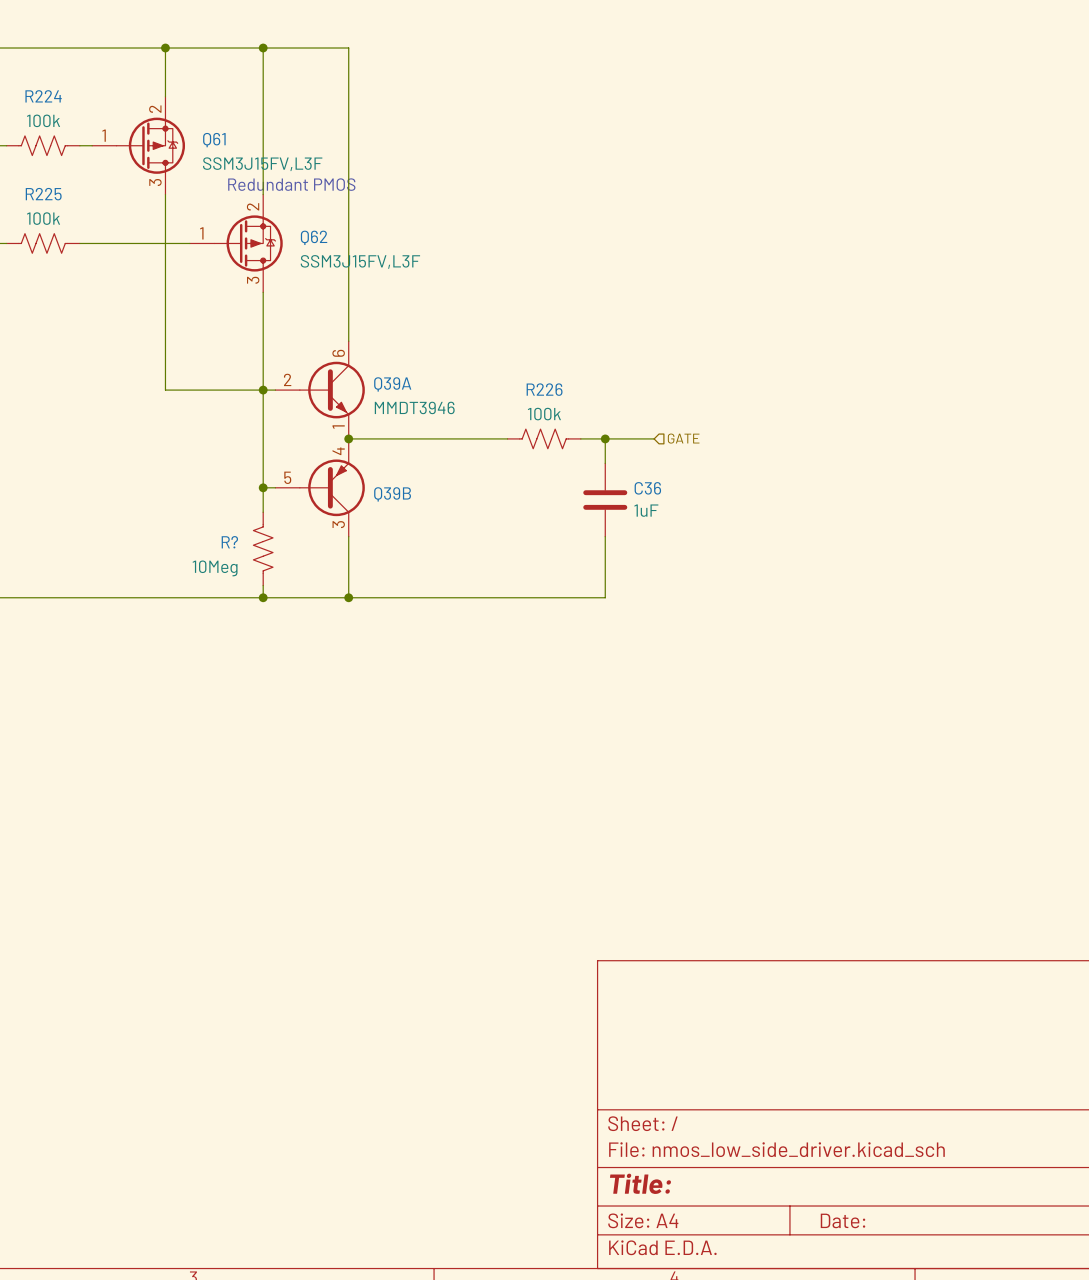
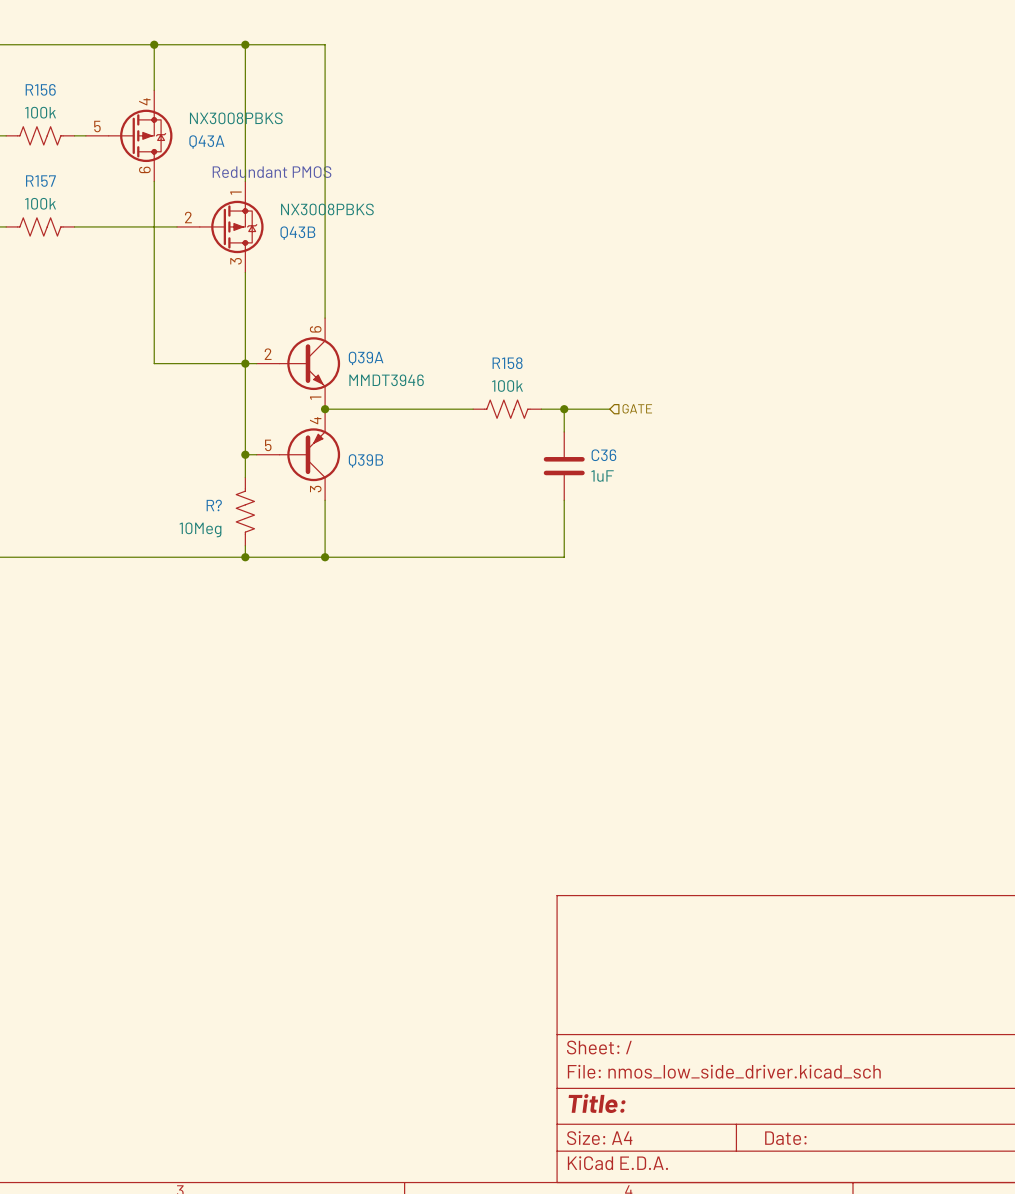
R224 name: R224 (43, 96) -> R156 (40, 89)
Q61: SSM3J15FV,L3F (138, 145) -> none
Q43A: none -> NX3008PBKS (129, 135)
R225 name: R225 (43, 194) -> R157 (40, 181)
Q62: SSM3J15FV,L3F (236, 243) -> none
Q43B: none -> NX3008PBKS (220, 226)
R226 name: R226 (544, 389) -> R158 (507, 363)

